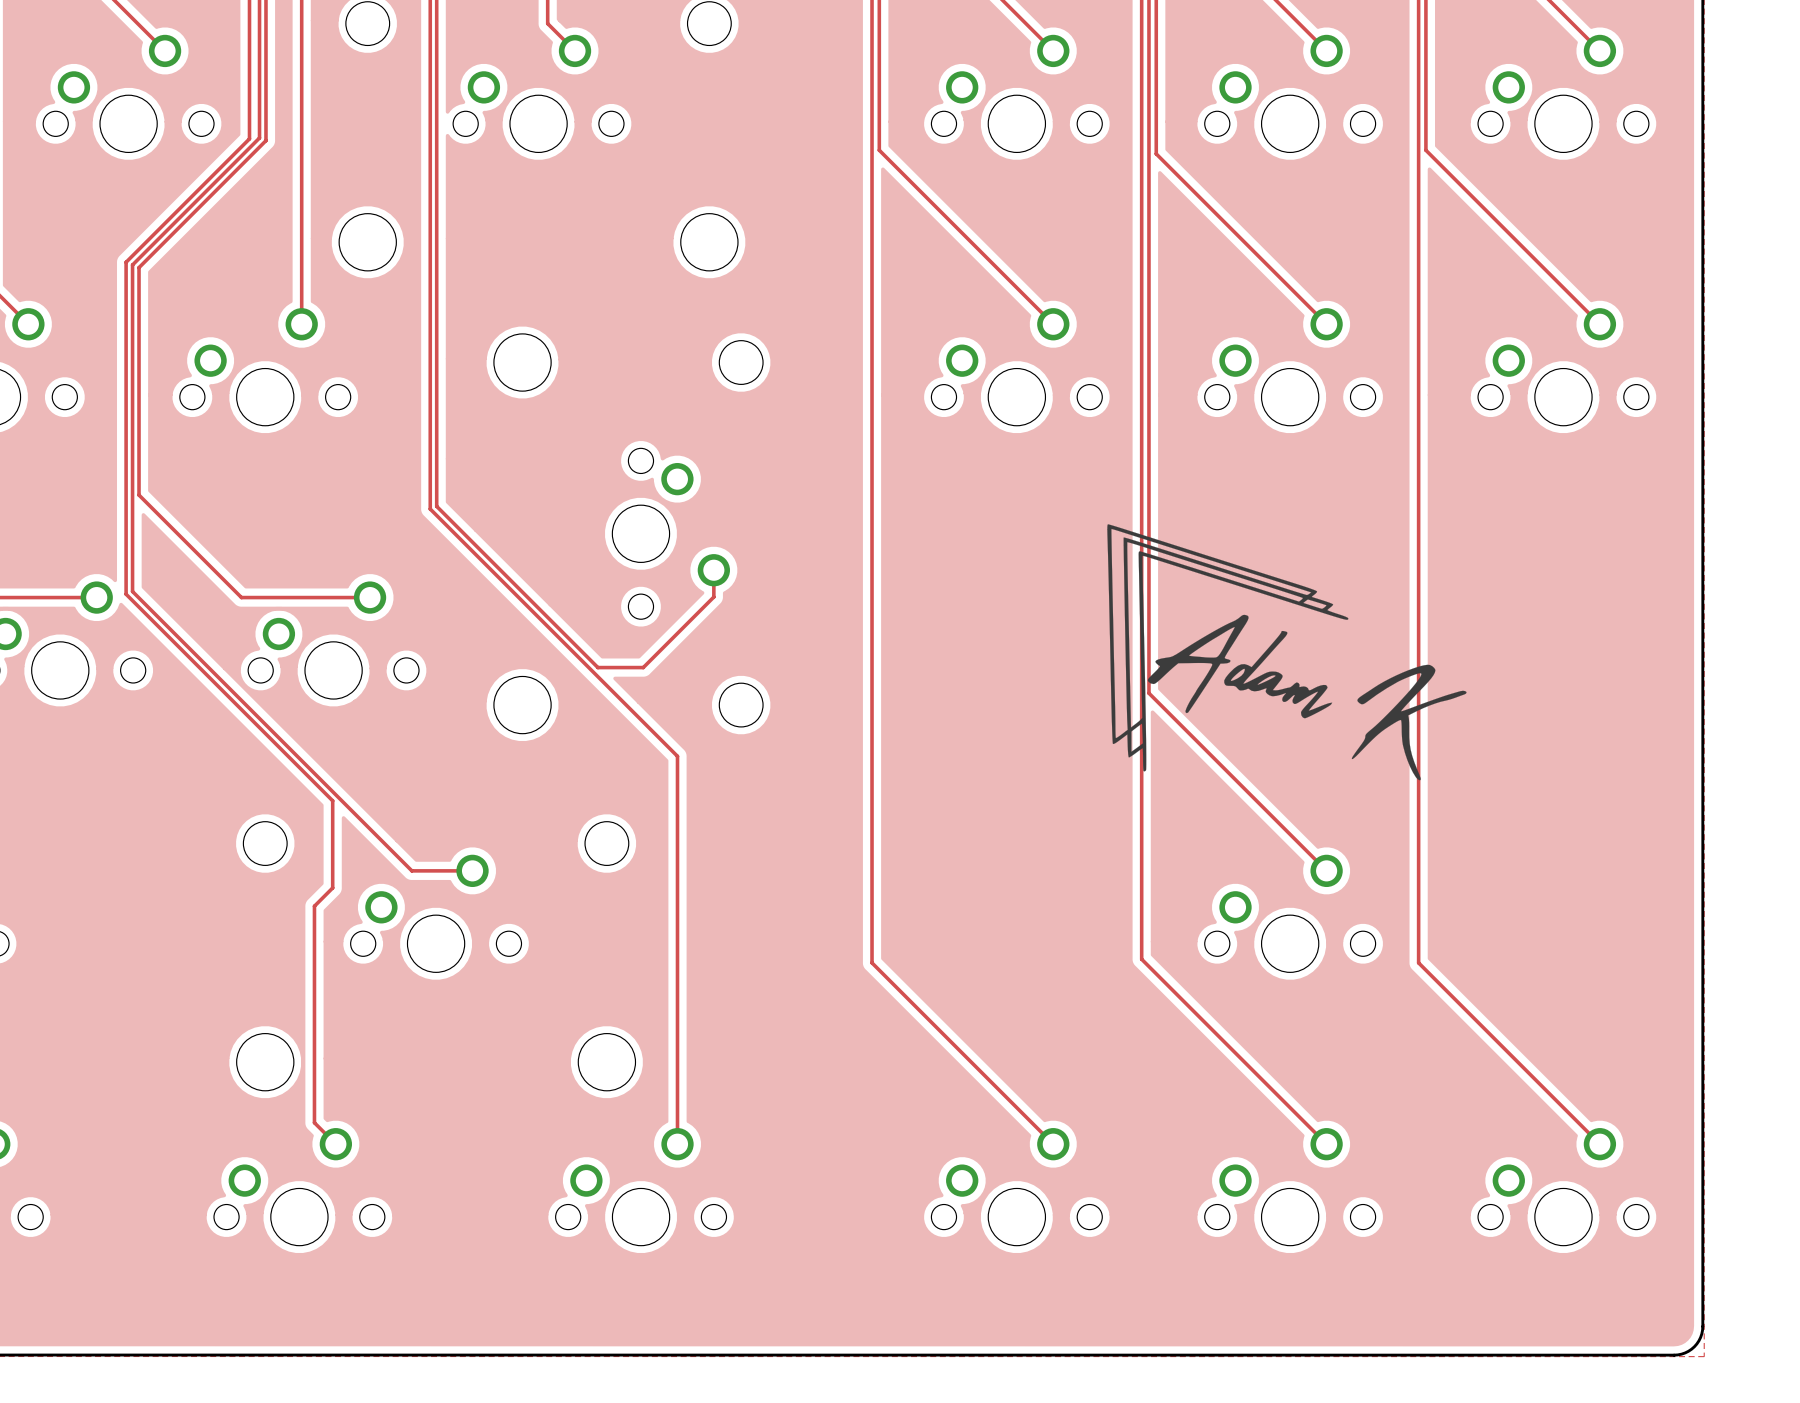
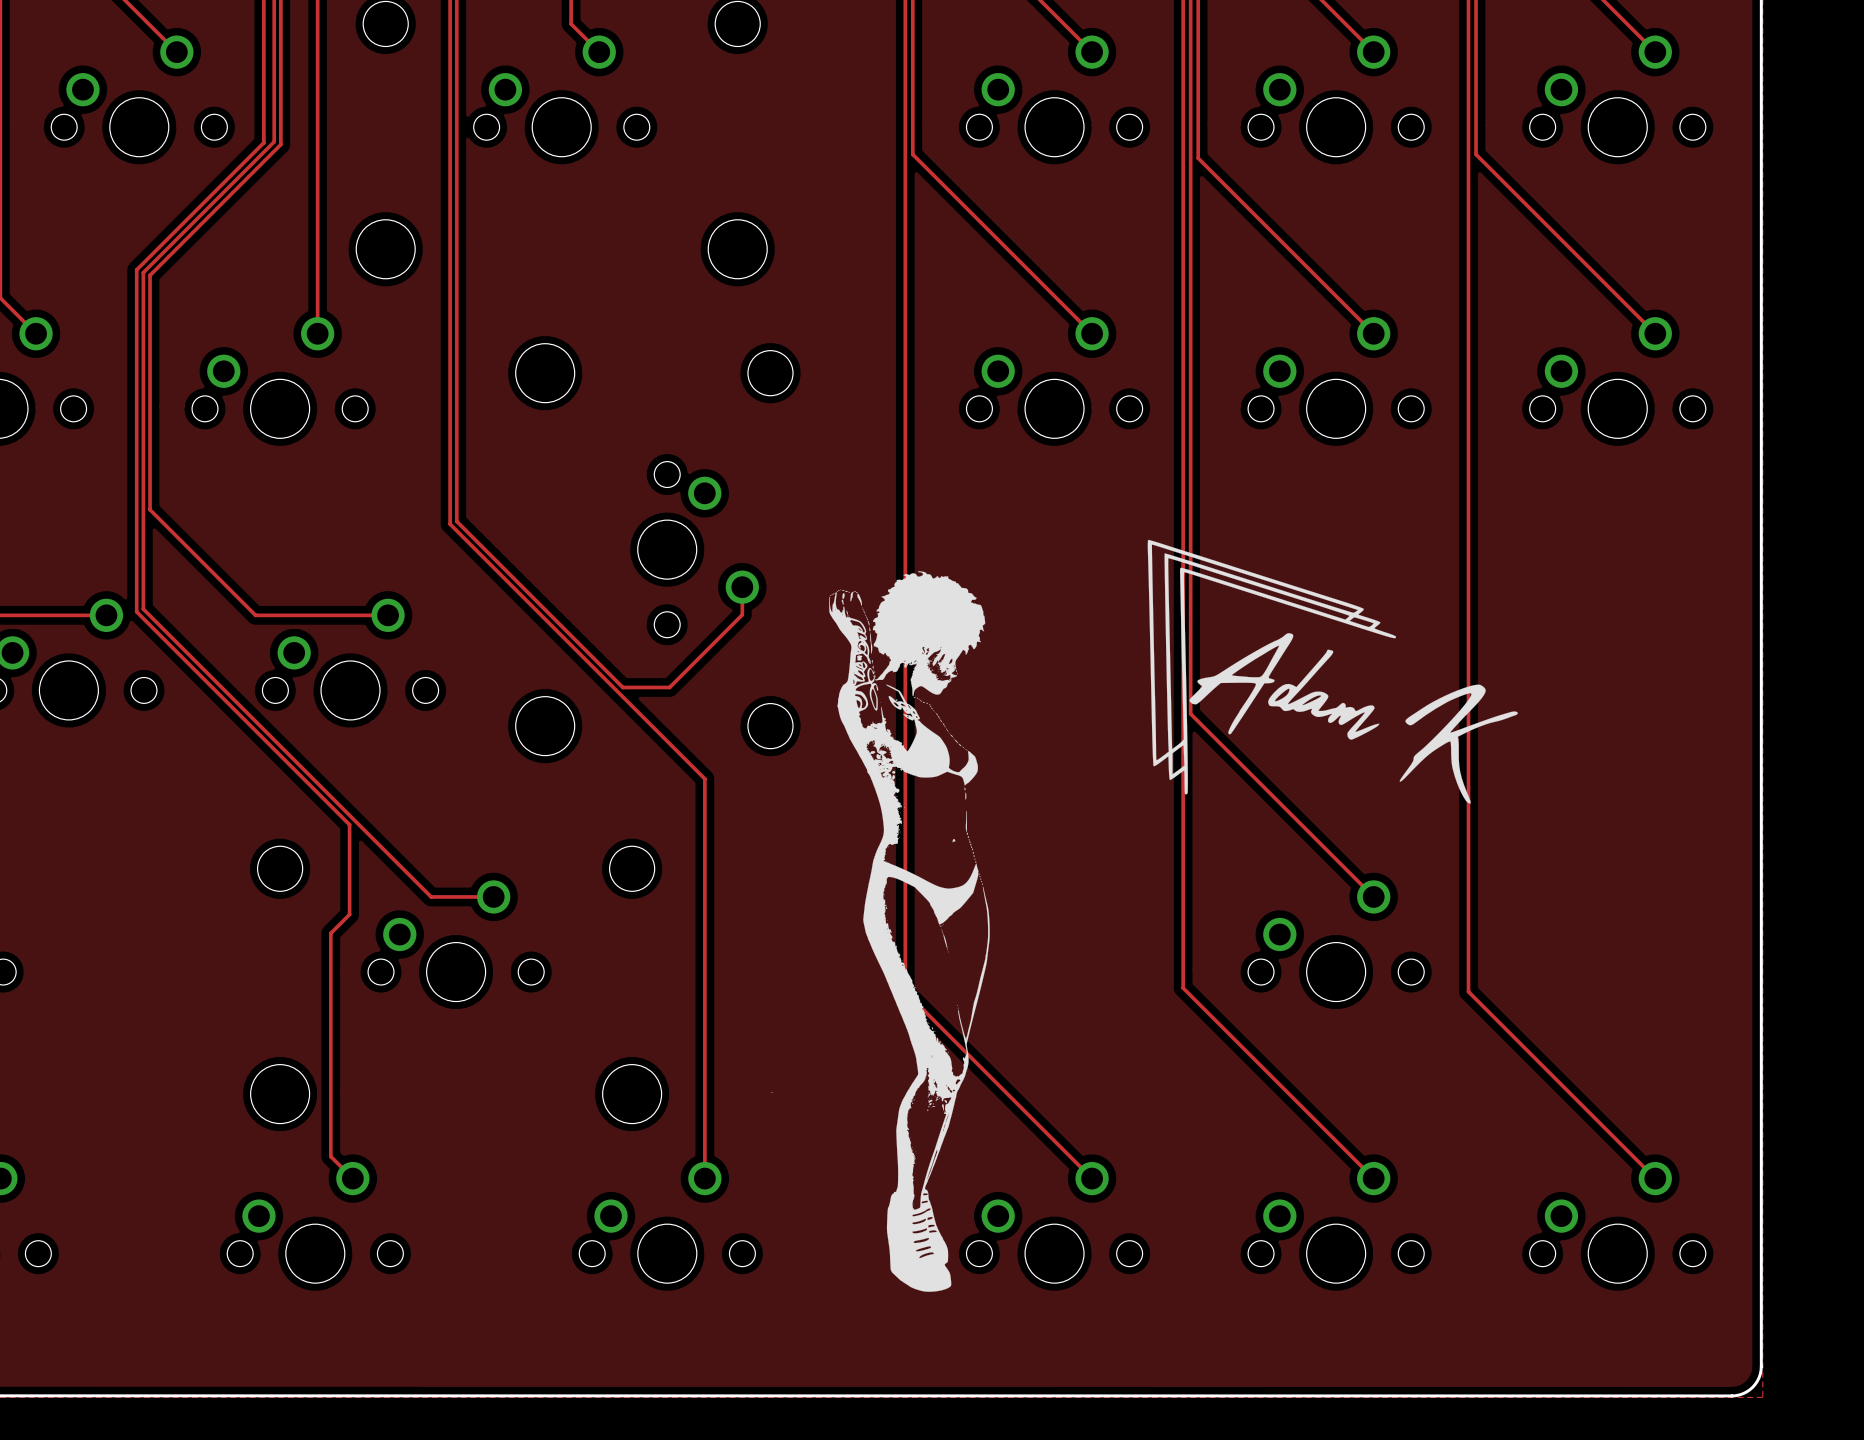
drawing: none -> [771, 571, 990, 1292]

